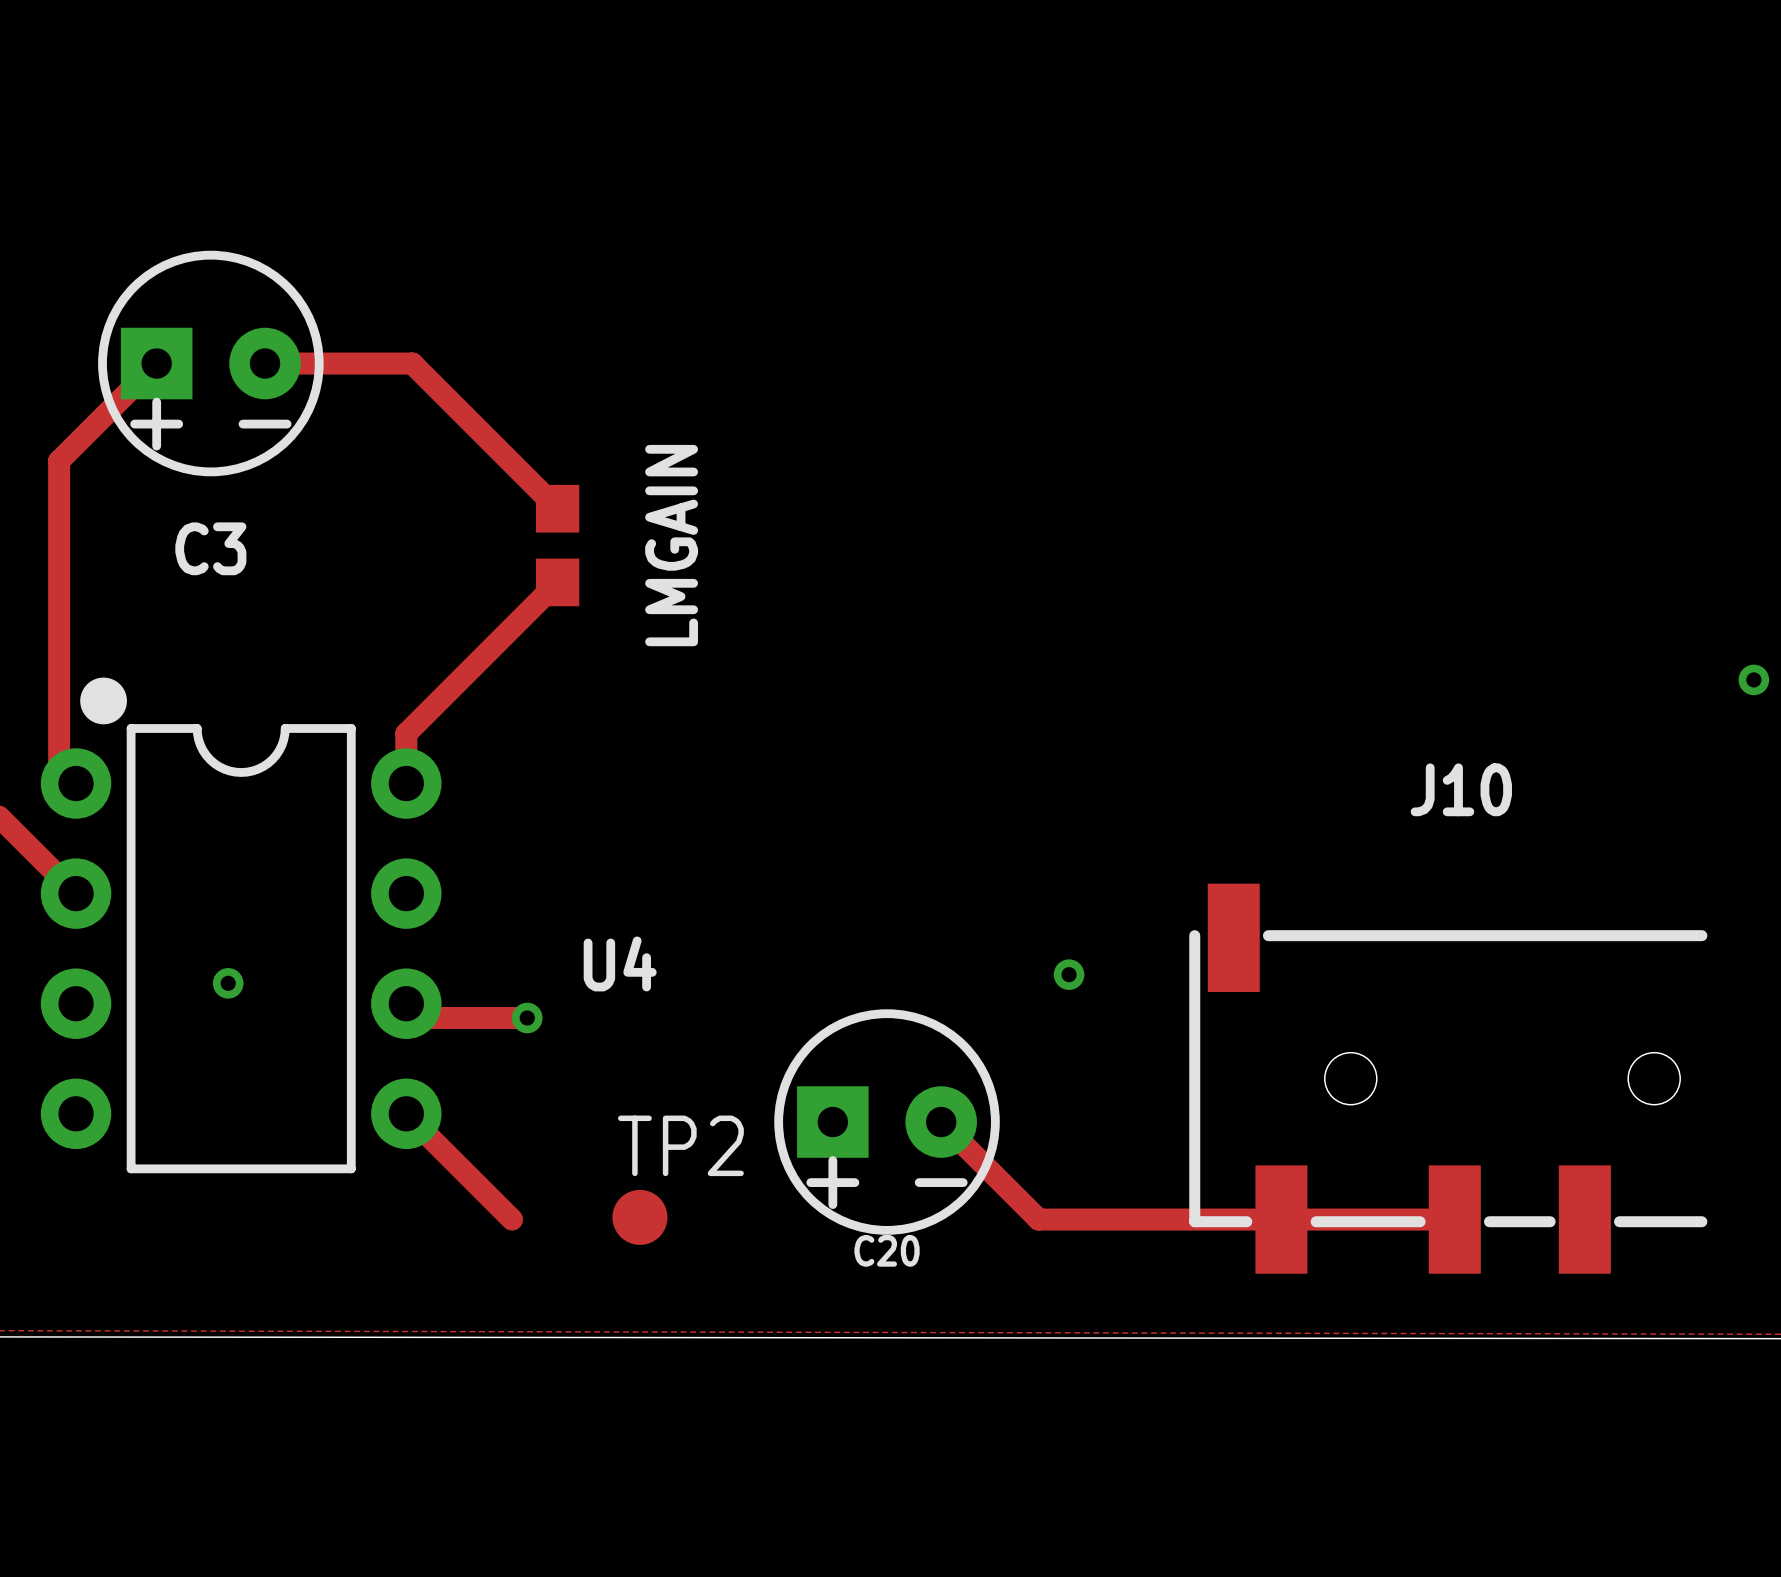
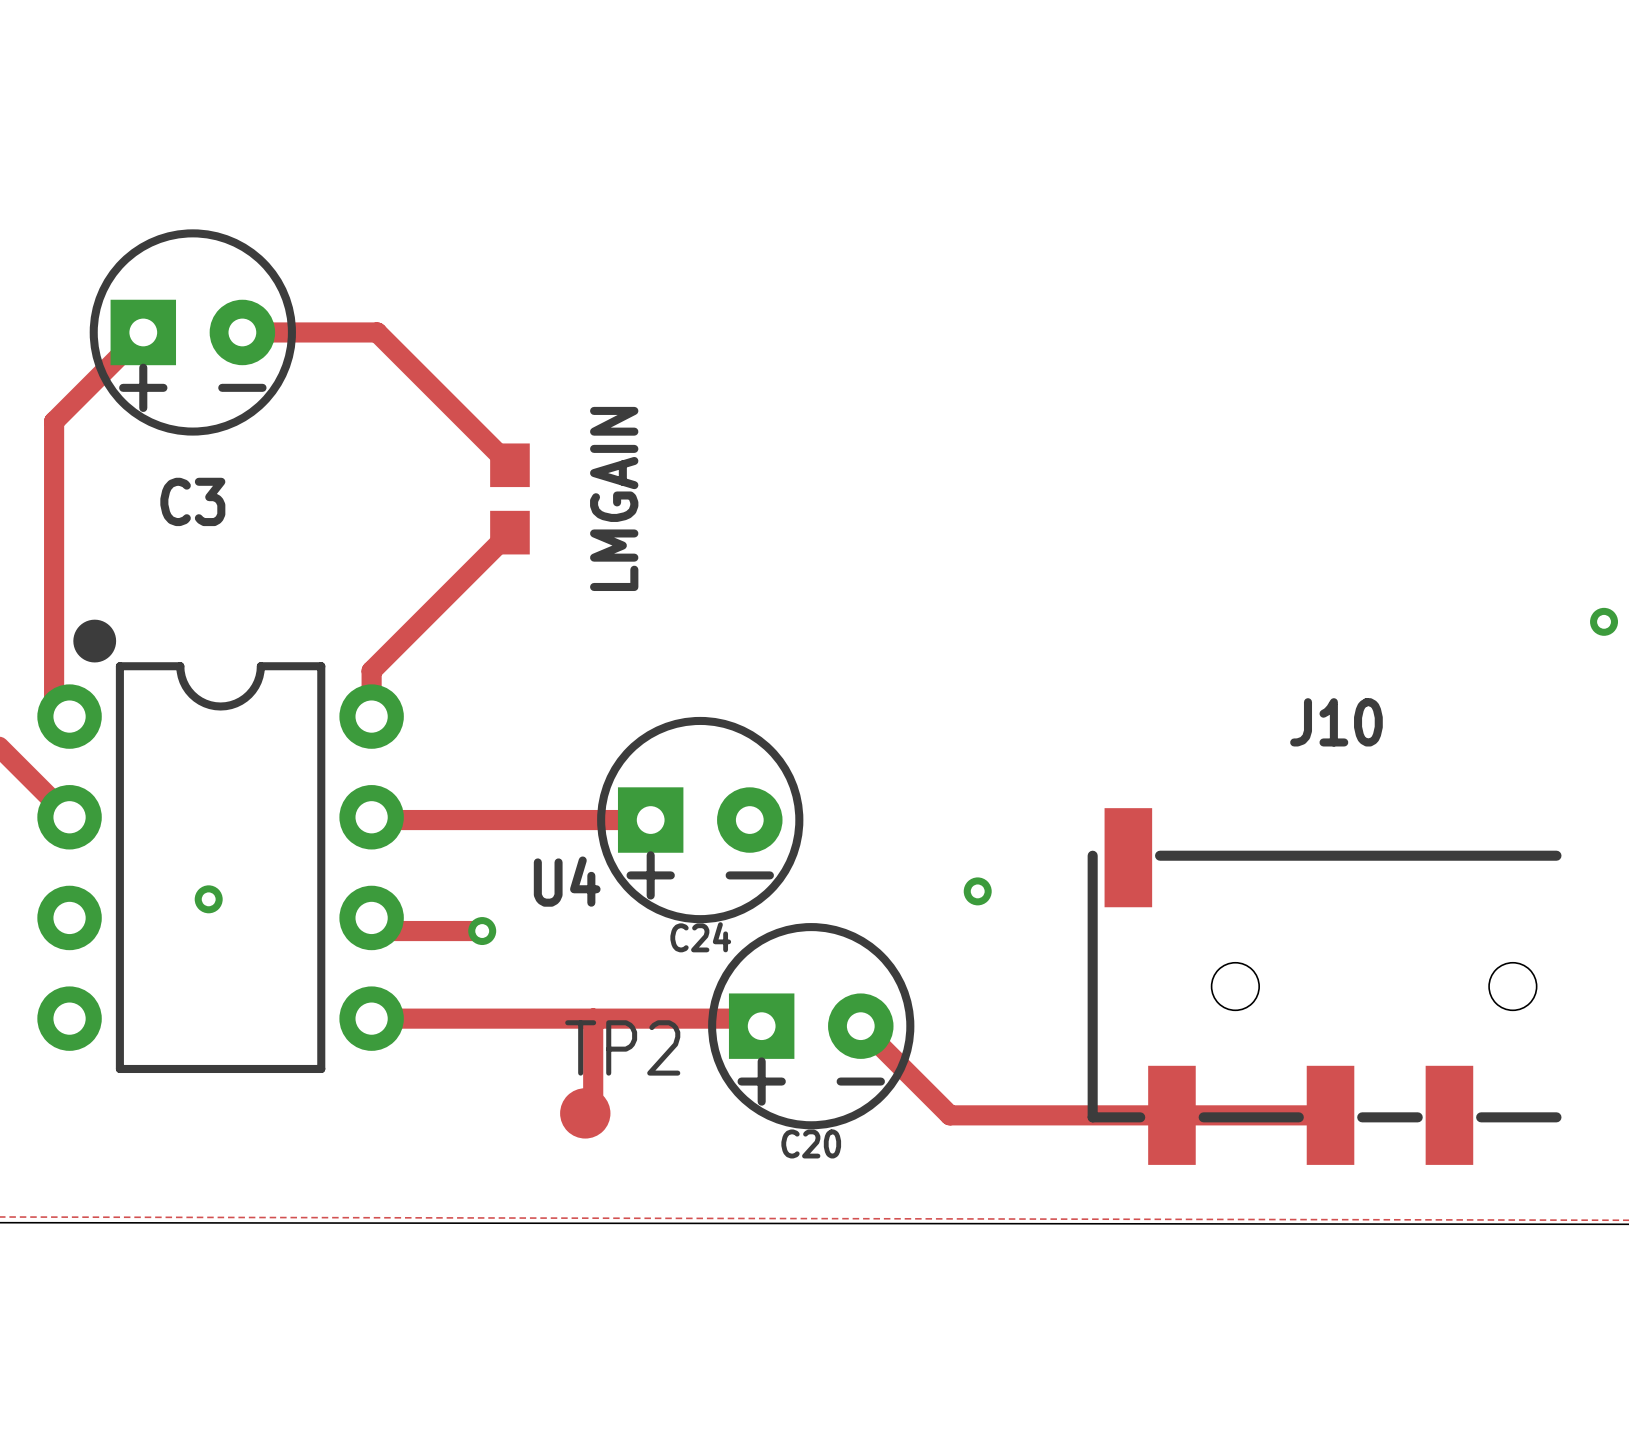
track: none -> (371, 817) (374, 820) (650, 820)
C24: none -> (700, 820)
track: (406, 1113) (512, 1219) -> (371, 1018) (754, 1018) (761, 1026)
track: none -> (593, 1018) (593, 1105) (585, 1113)

